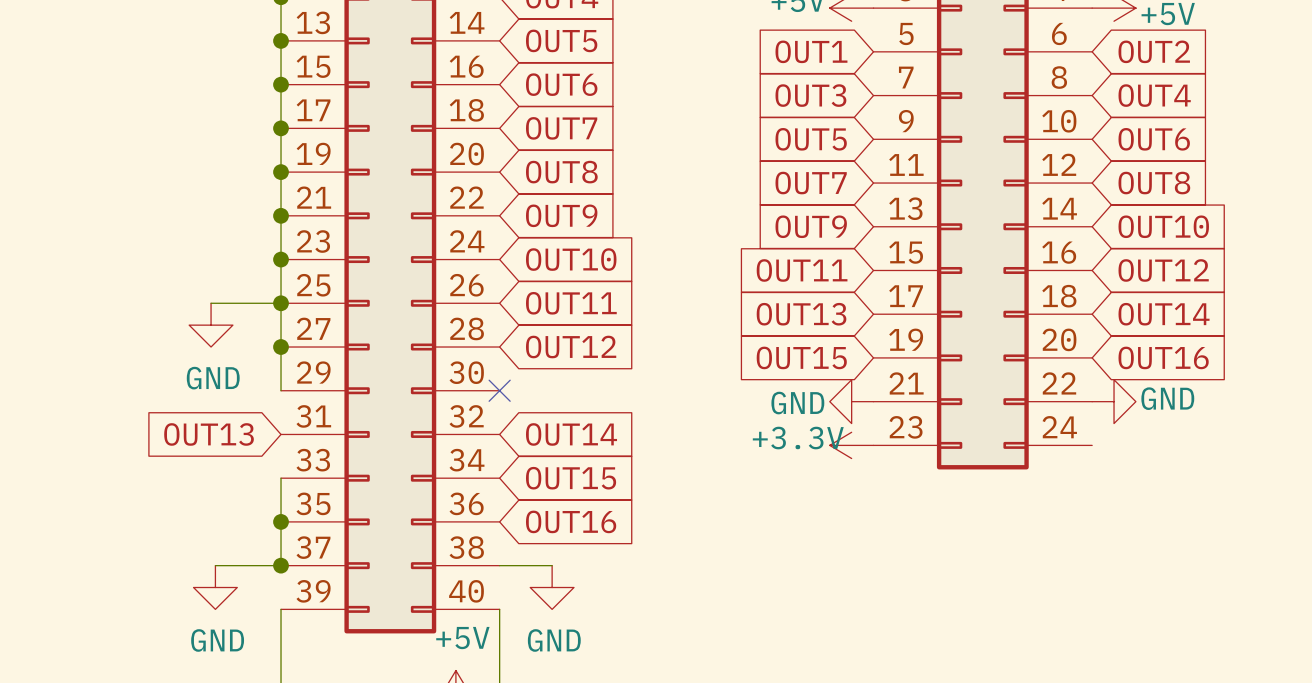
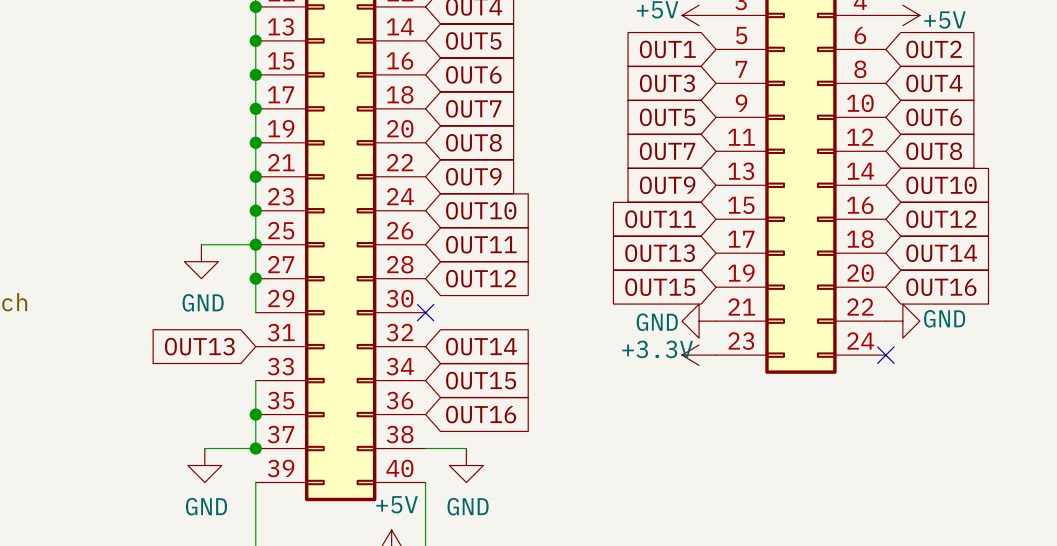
no-connect mark: none -> (885, 355)

